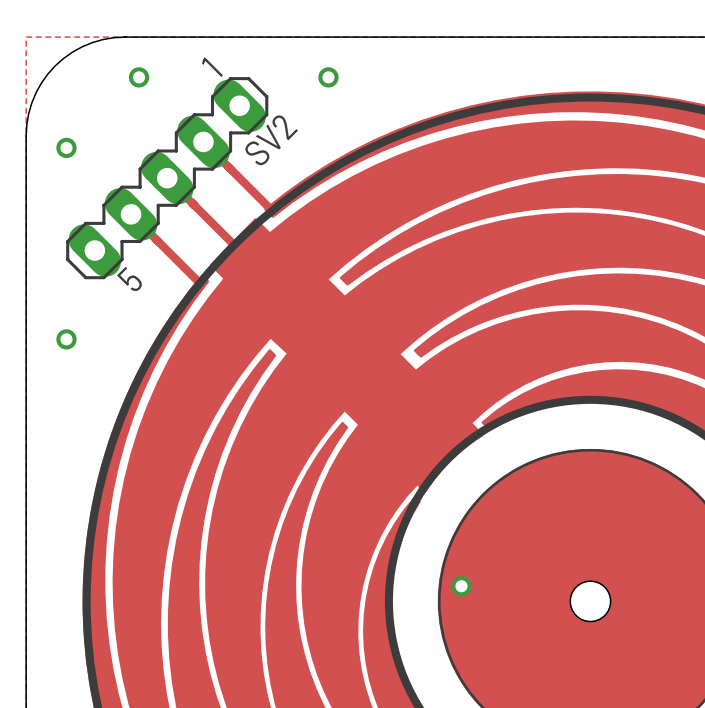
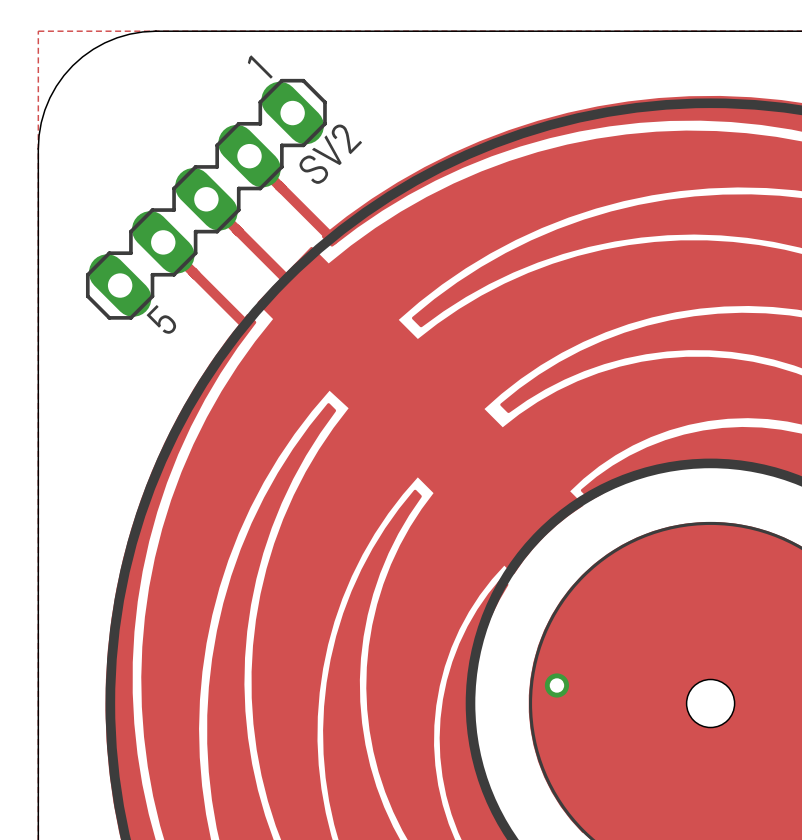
via: (139, 77) -> none
via: (328, 77) -> none
via: (66, 147) -> none
via: (66, 339) -> none

